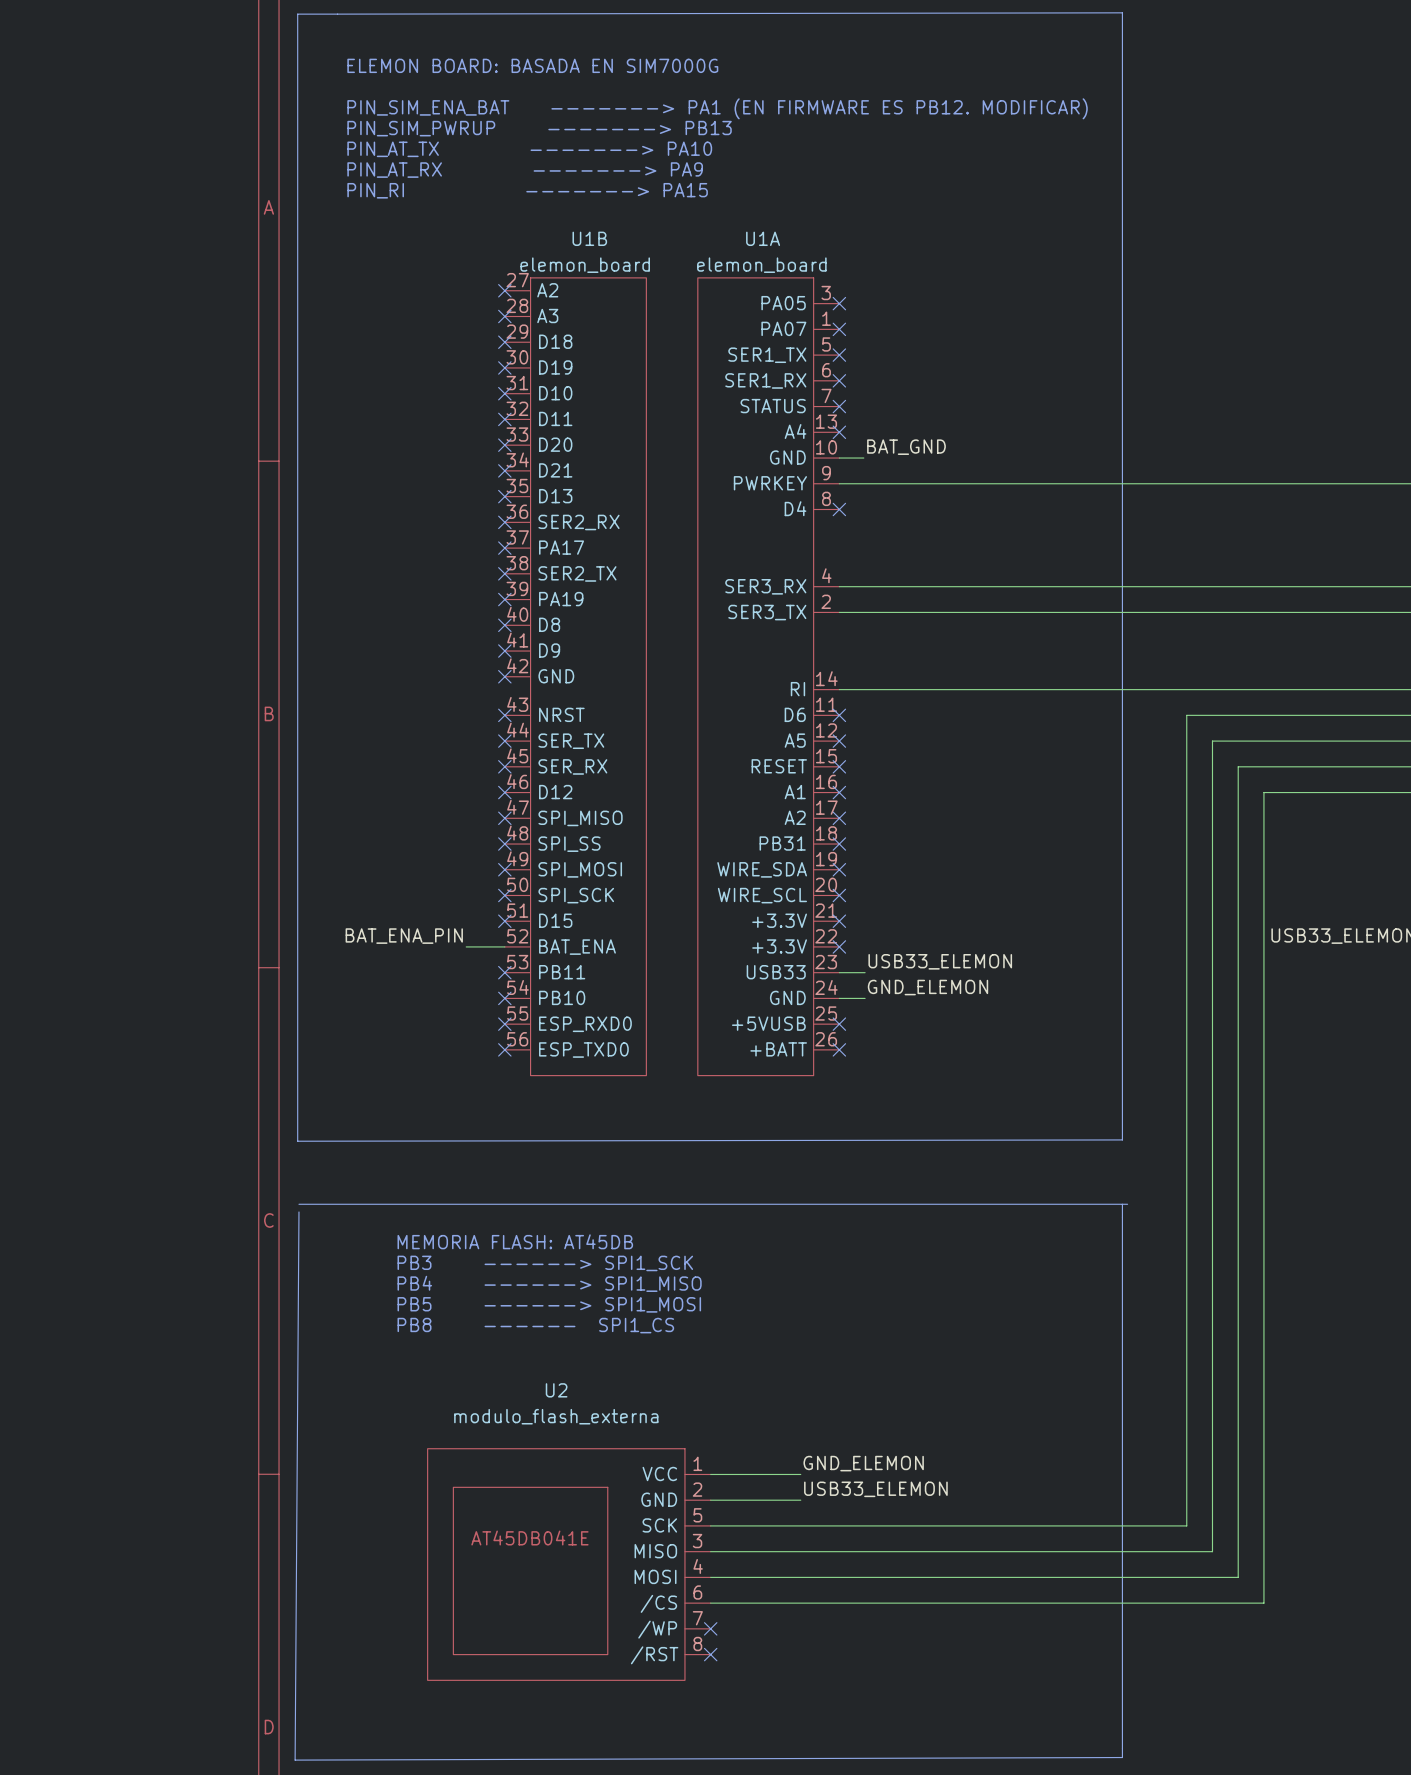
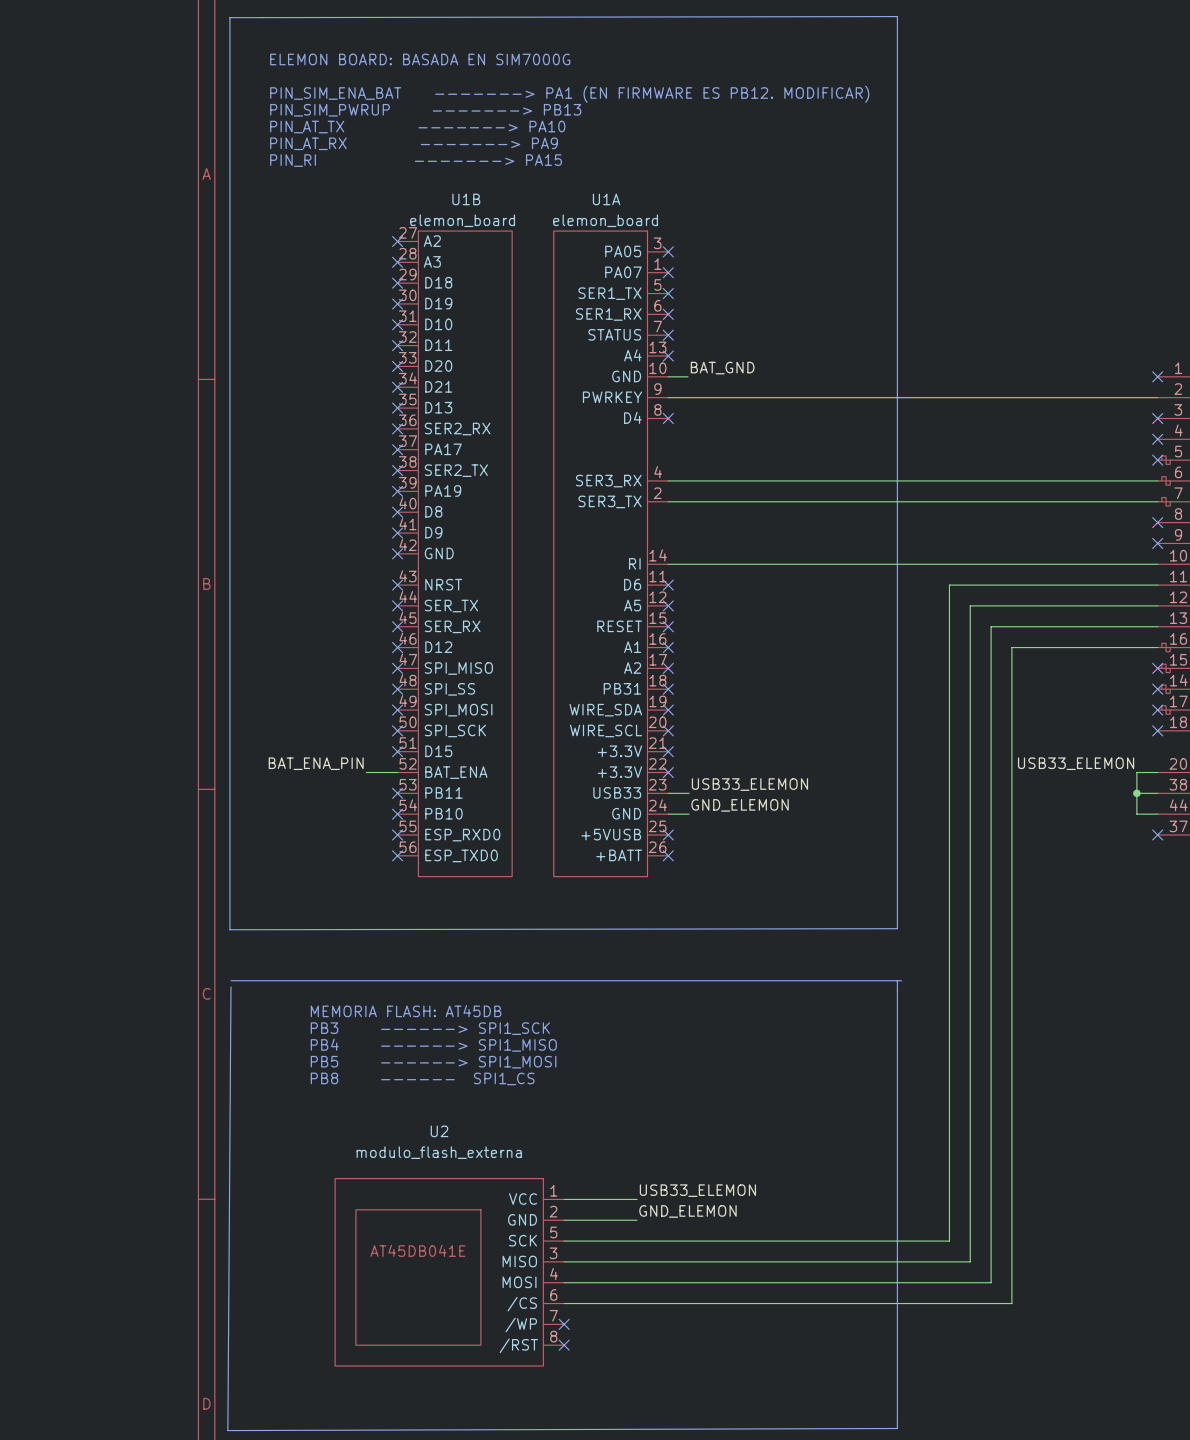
label: GND_ELEMON (863, 1463) -> USB33_ELEMON (697, 1190)
label: USB33_ELEMON (875, 1489) -> GND_ELEMON (687, 1211)

